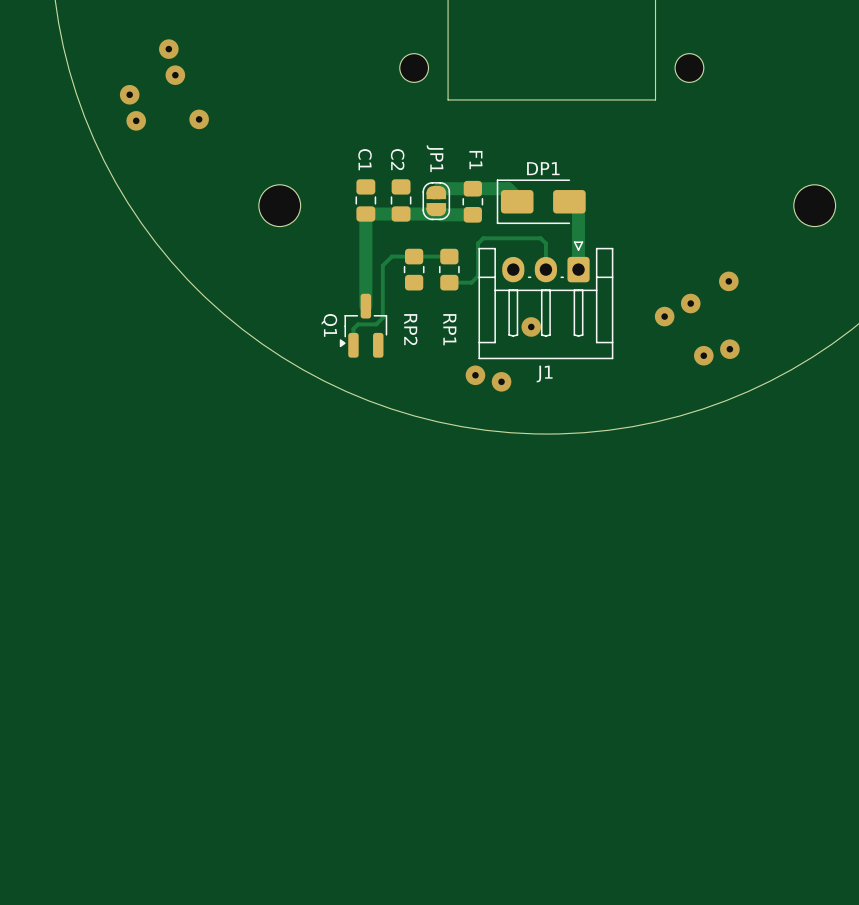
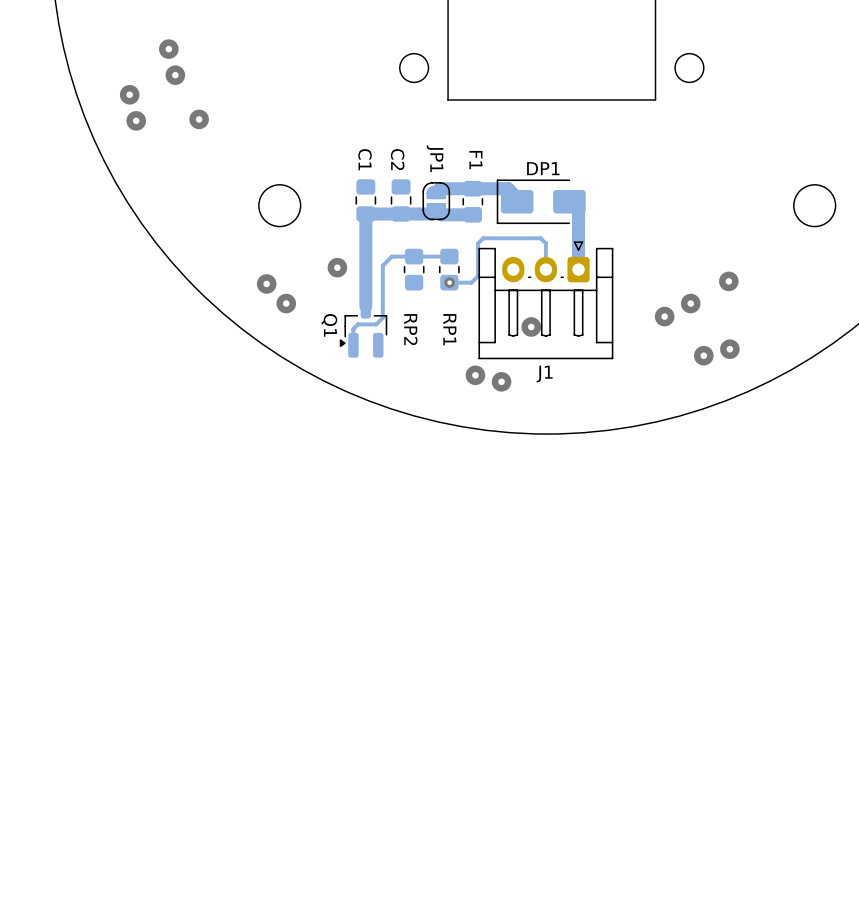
via: none -> (337, 267)
via: none -> (449, 282)
via: none -> (266, 283)
via: none -> (286, 303)

